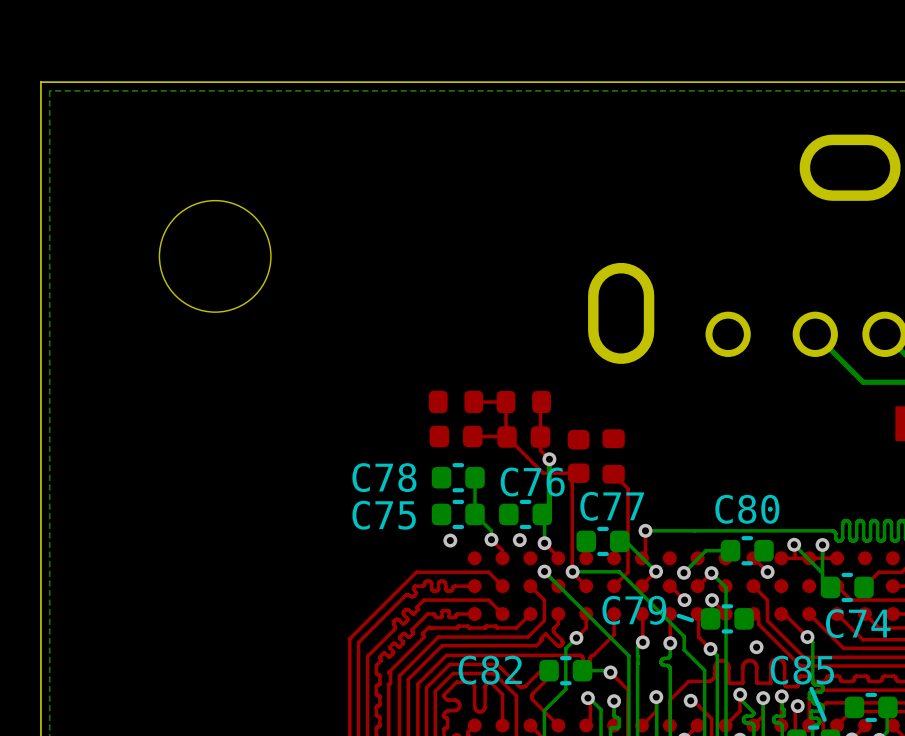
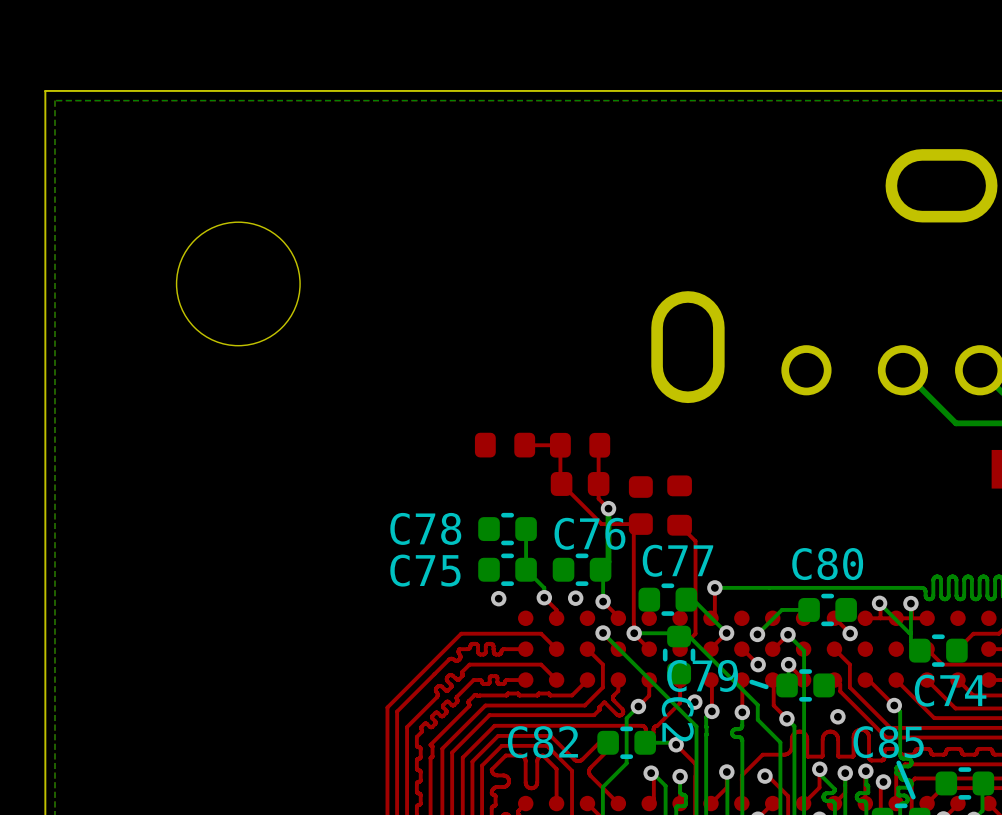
C2 side: top (456, 436) -> bottom (679, 655)
top track: (506, 436) (472, 436) -> none
via: none -> (694, 702)

